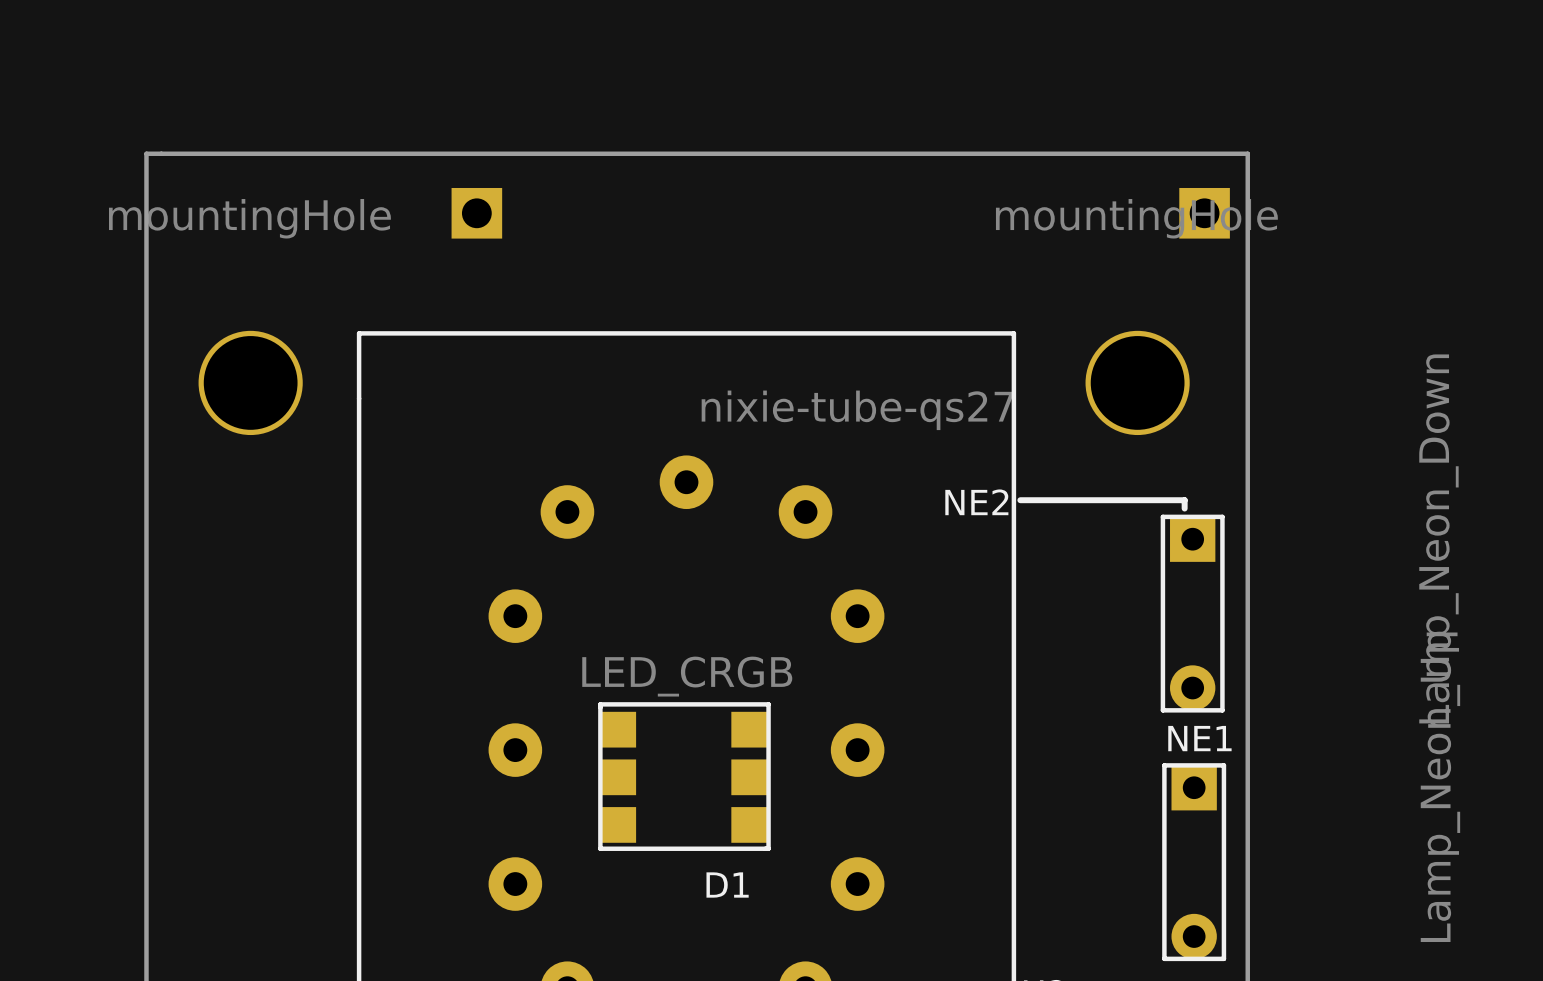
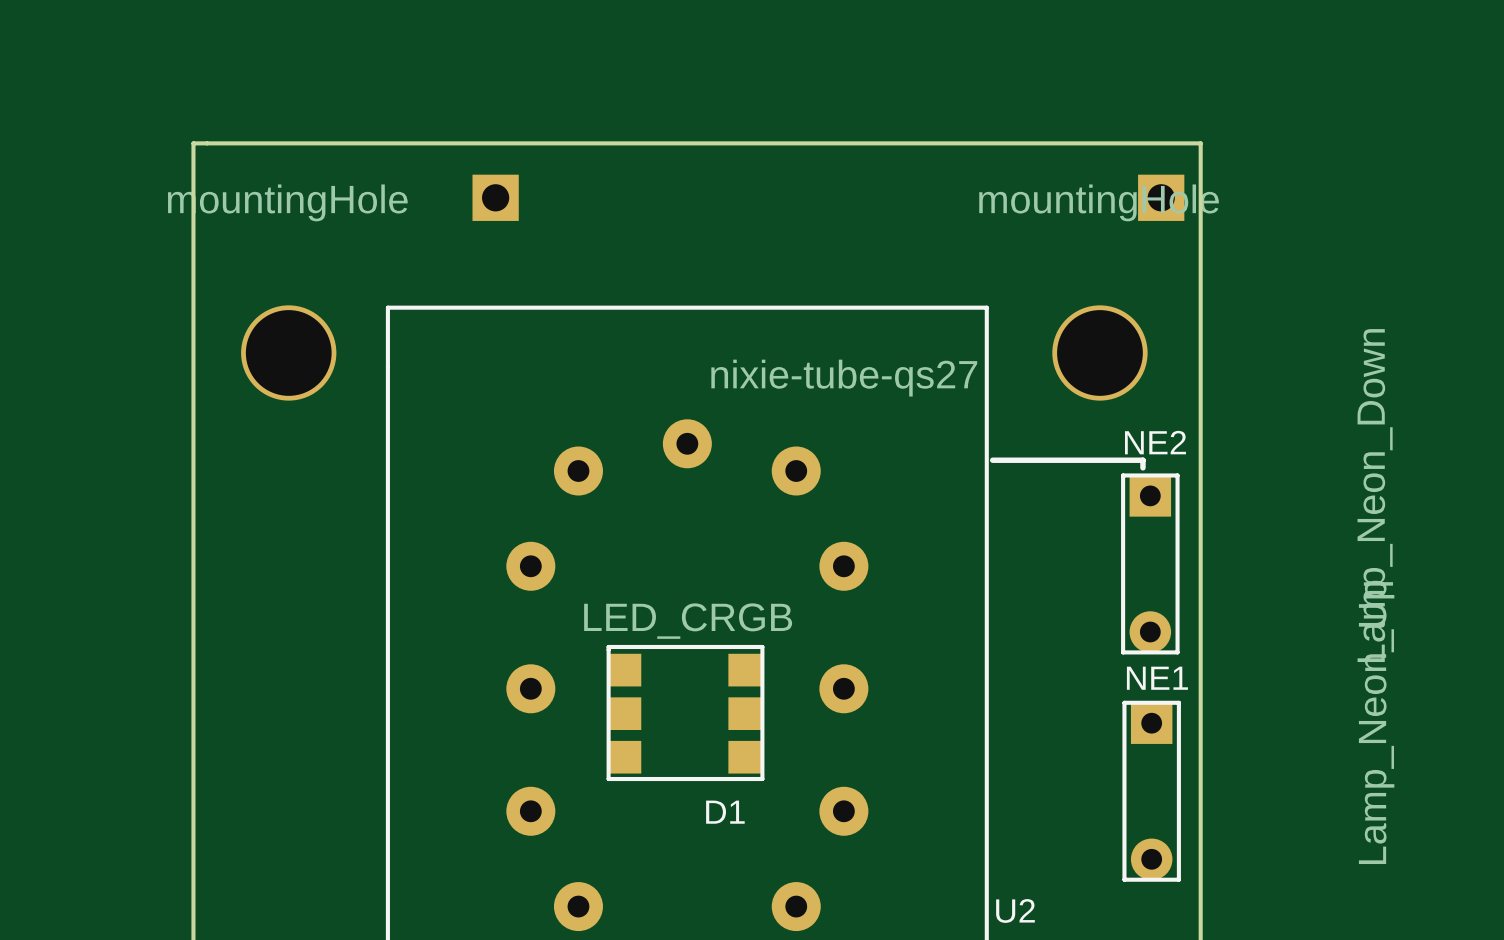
NE2 name position: NE2 (976, 502) -> NE2 (1155, 442)

